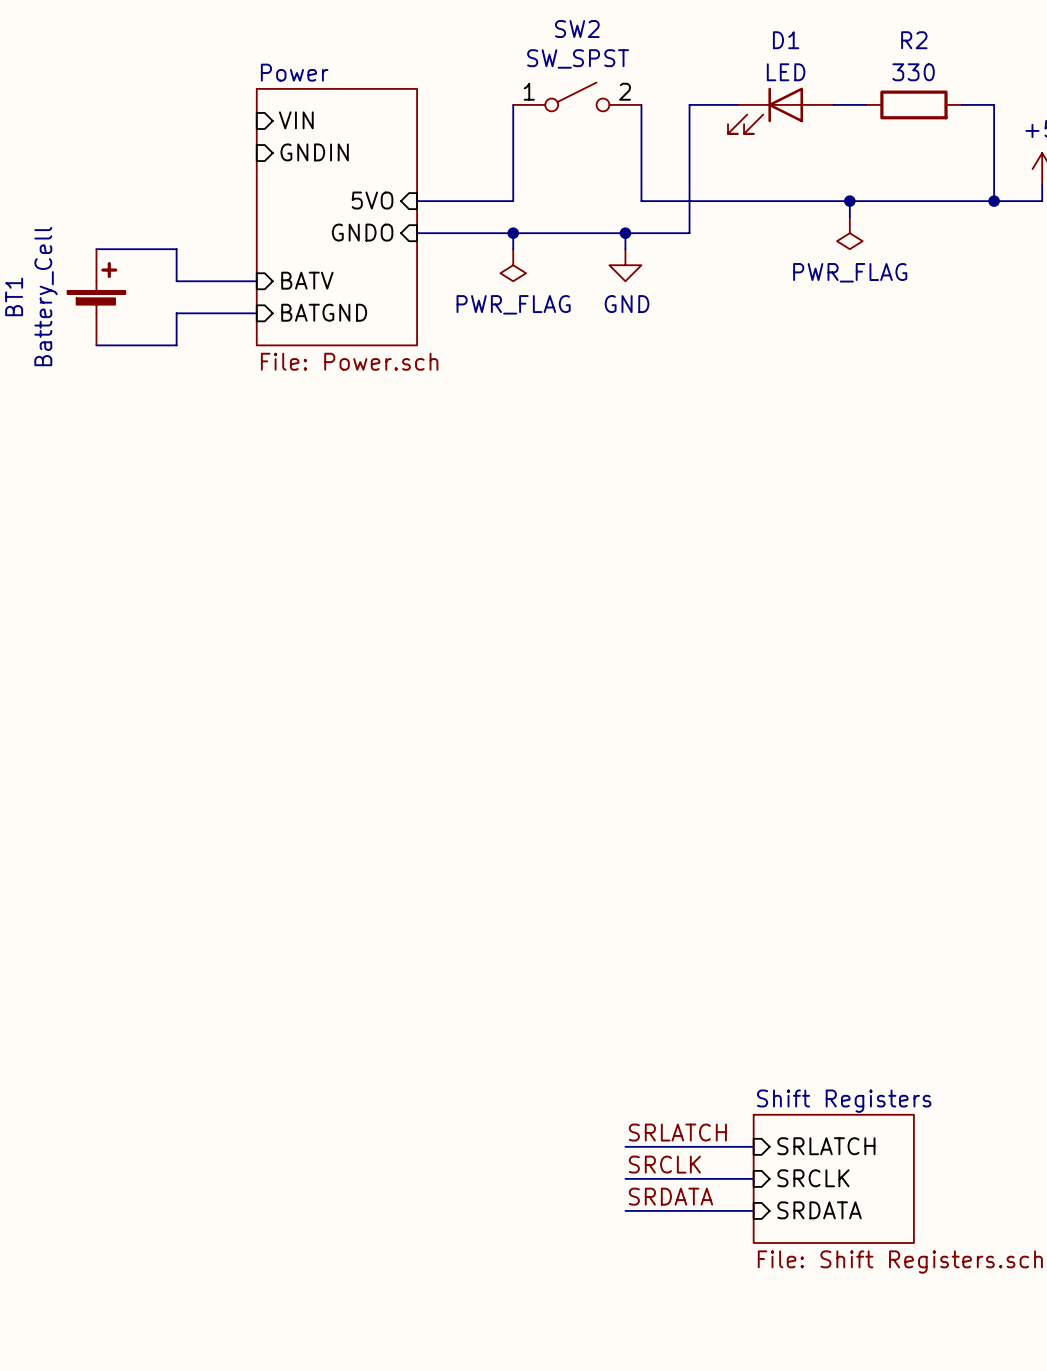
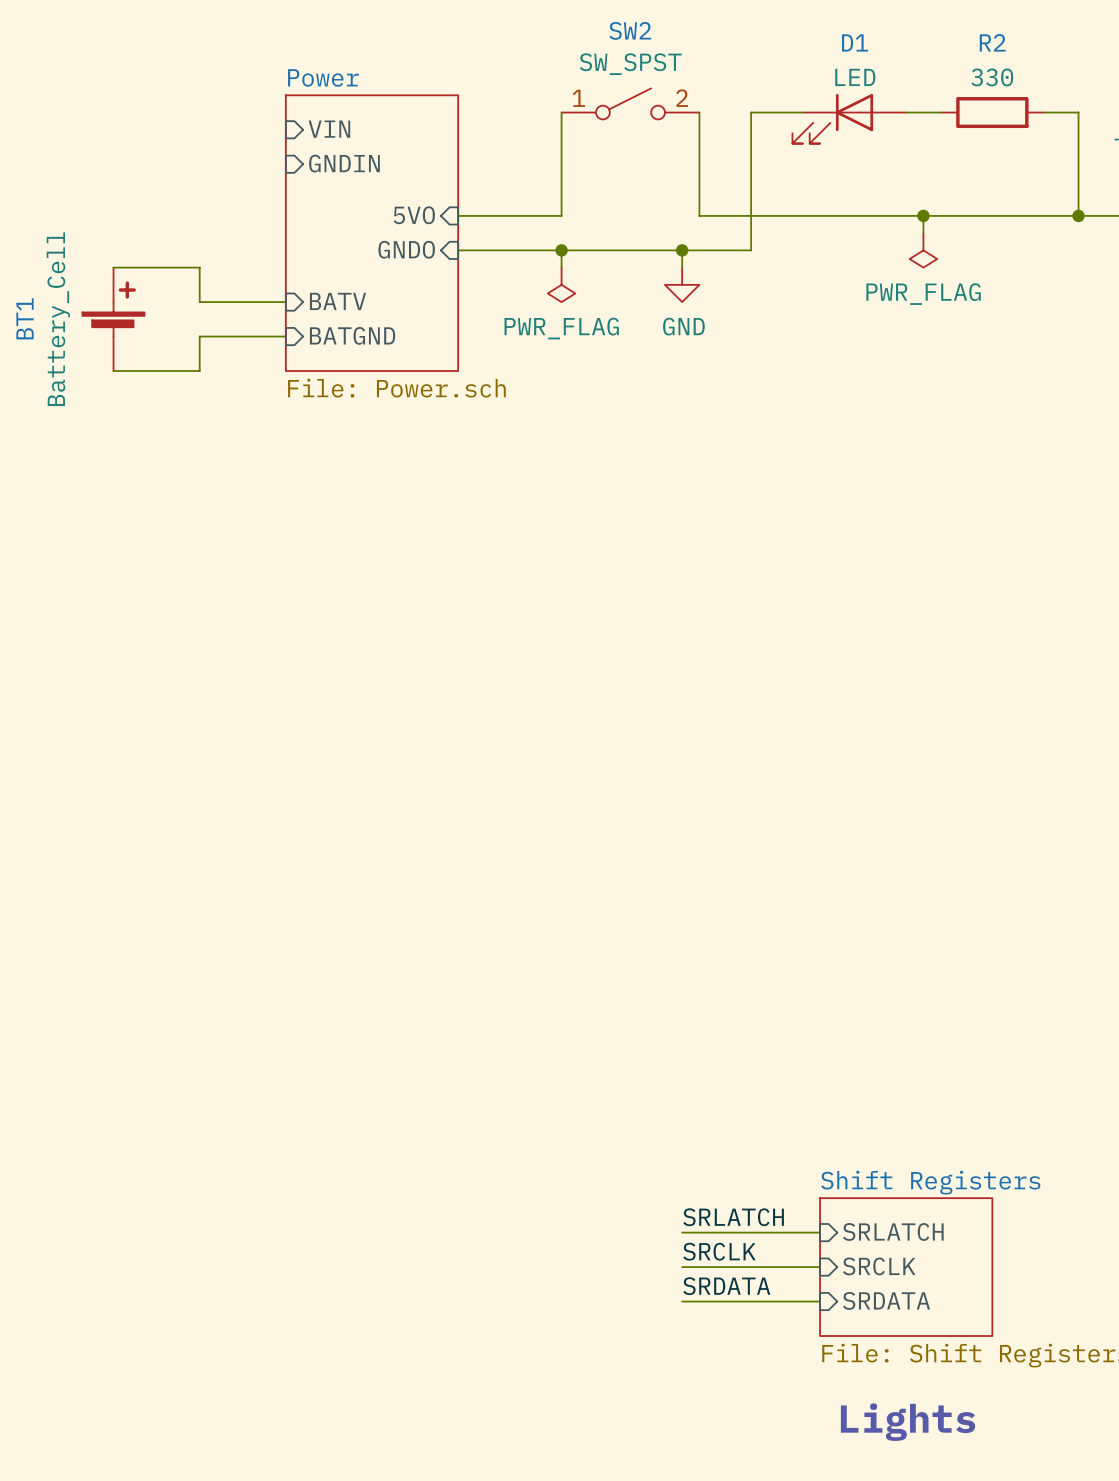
text: none -> Lights (908, 1422)

